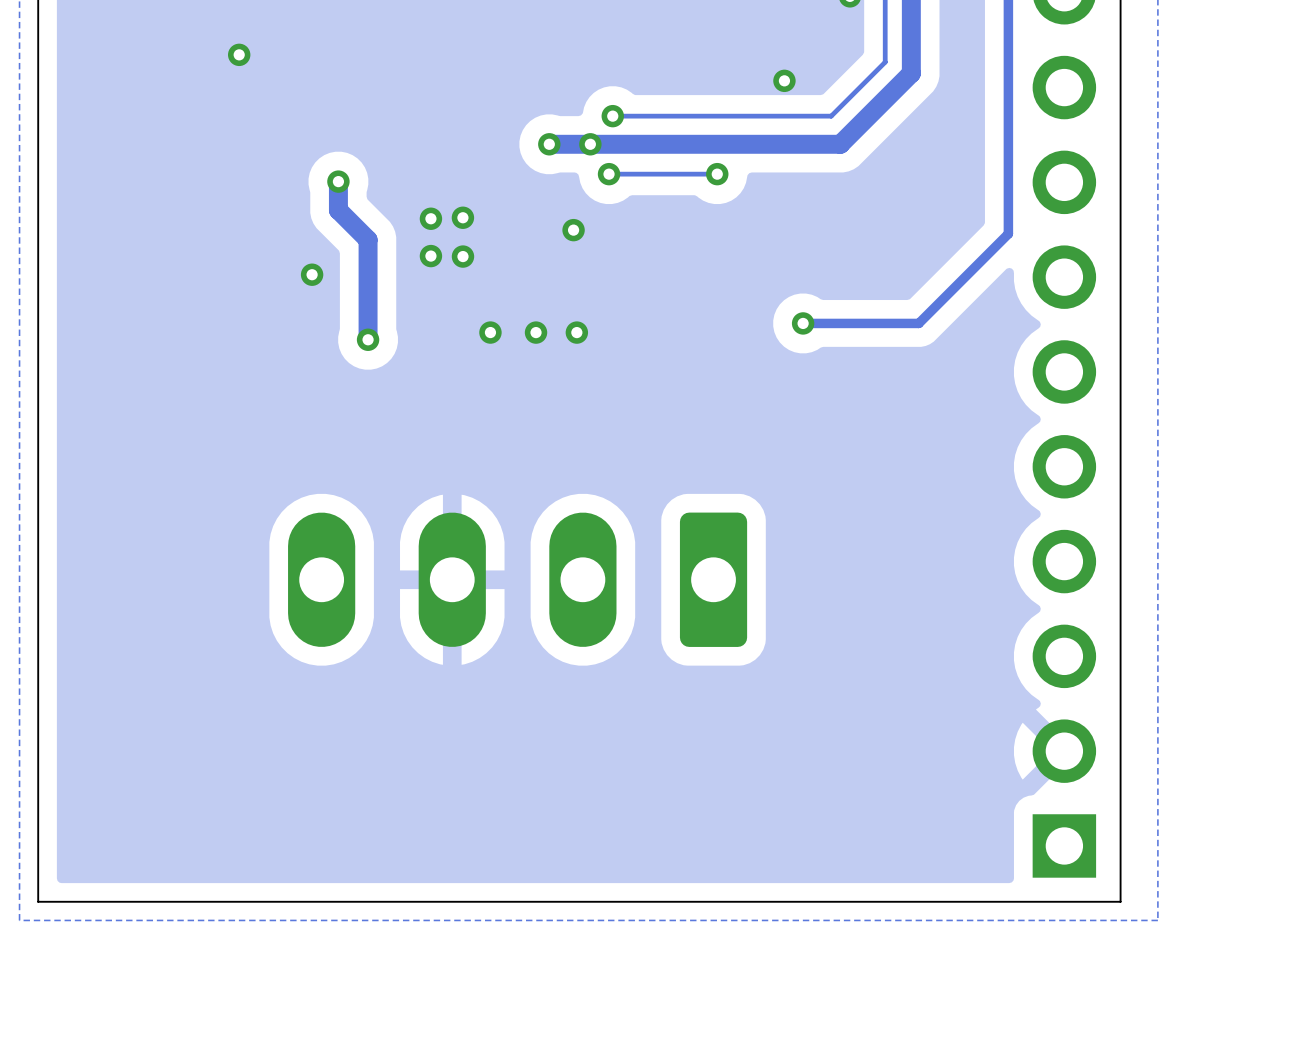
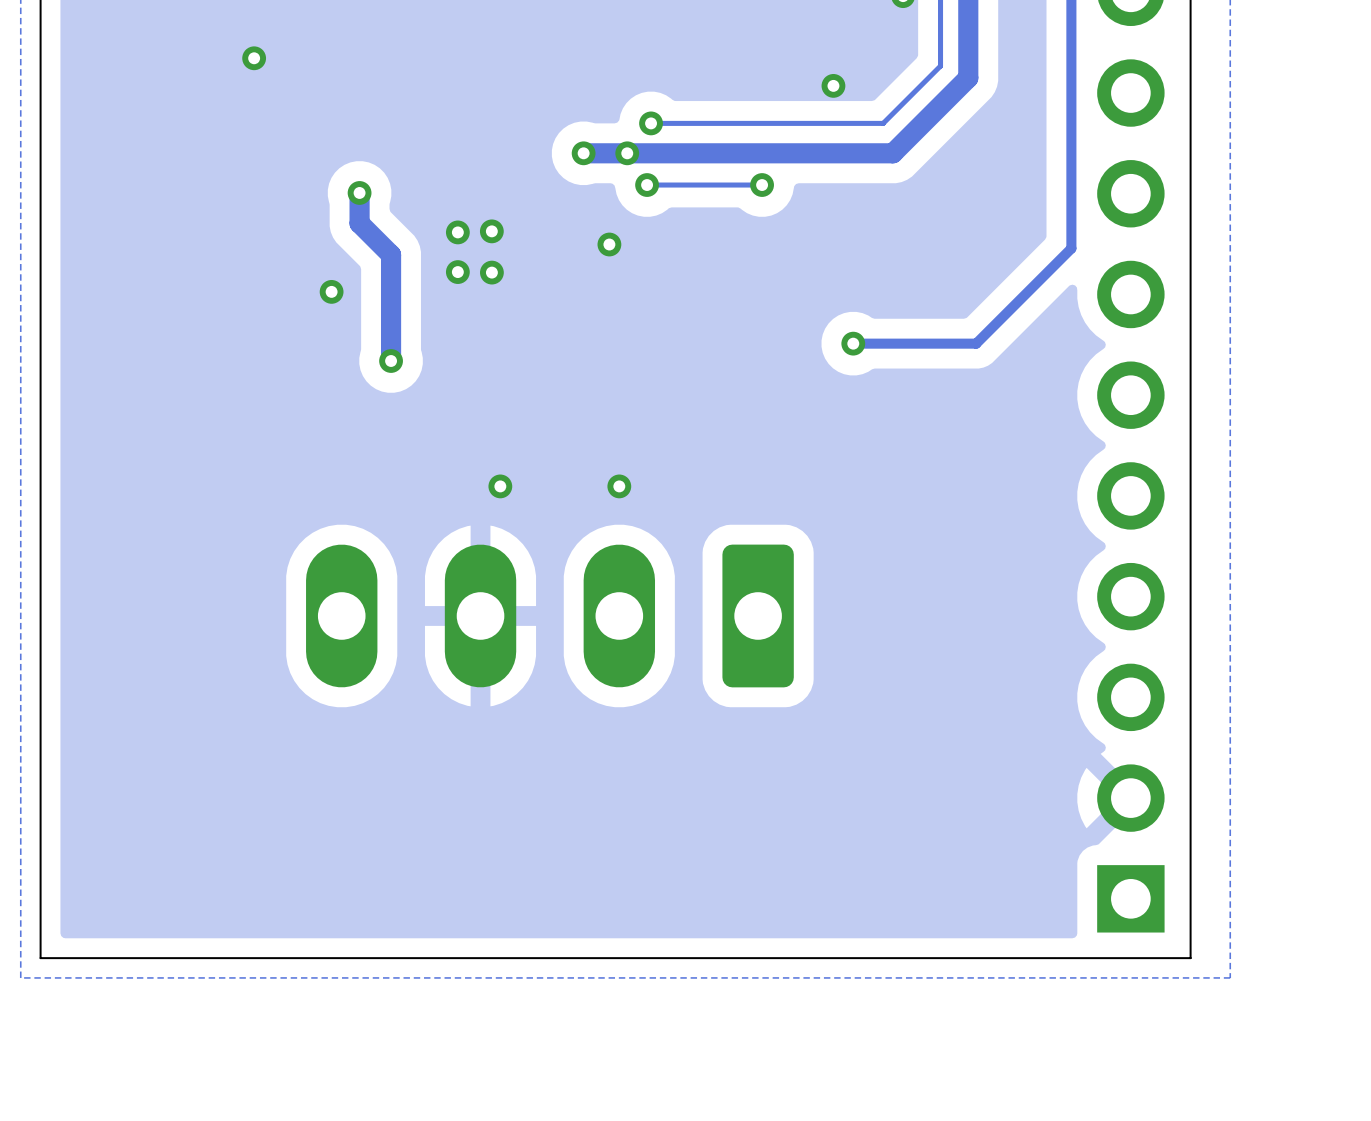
via: (490, 332) -> none
via: (536, 332) -> none
via: (576, 332) -> none
via: none -> (500, 486)
via: none -> (619, 486)

